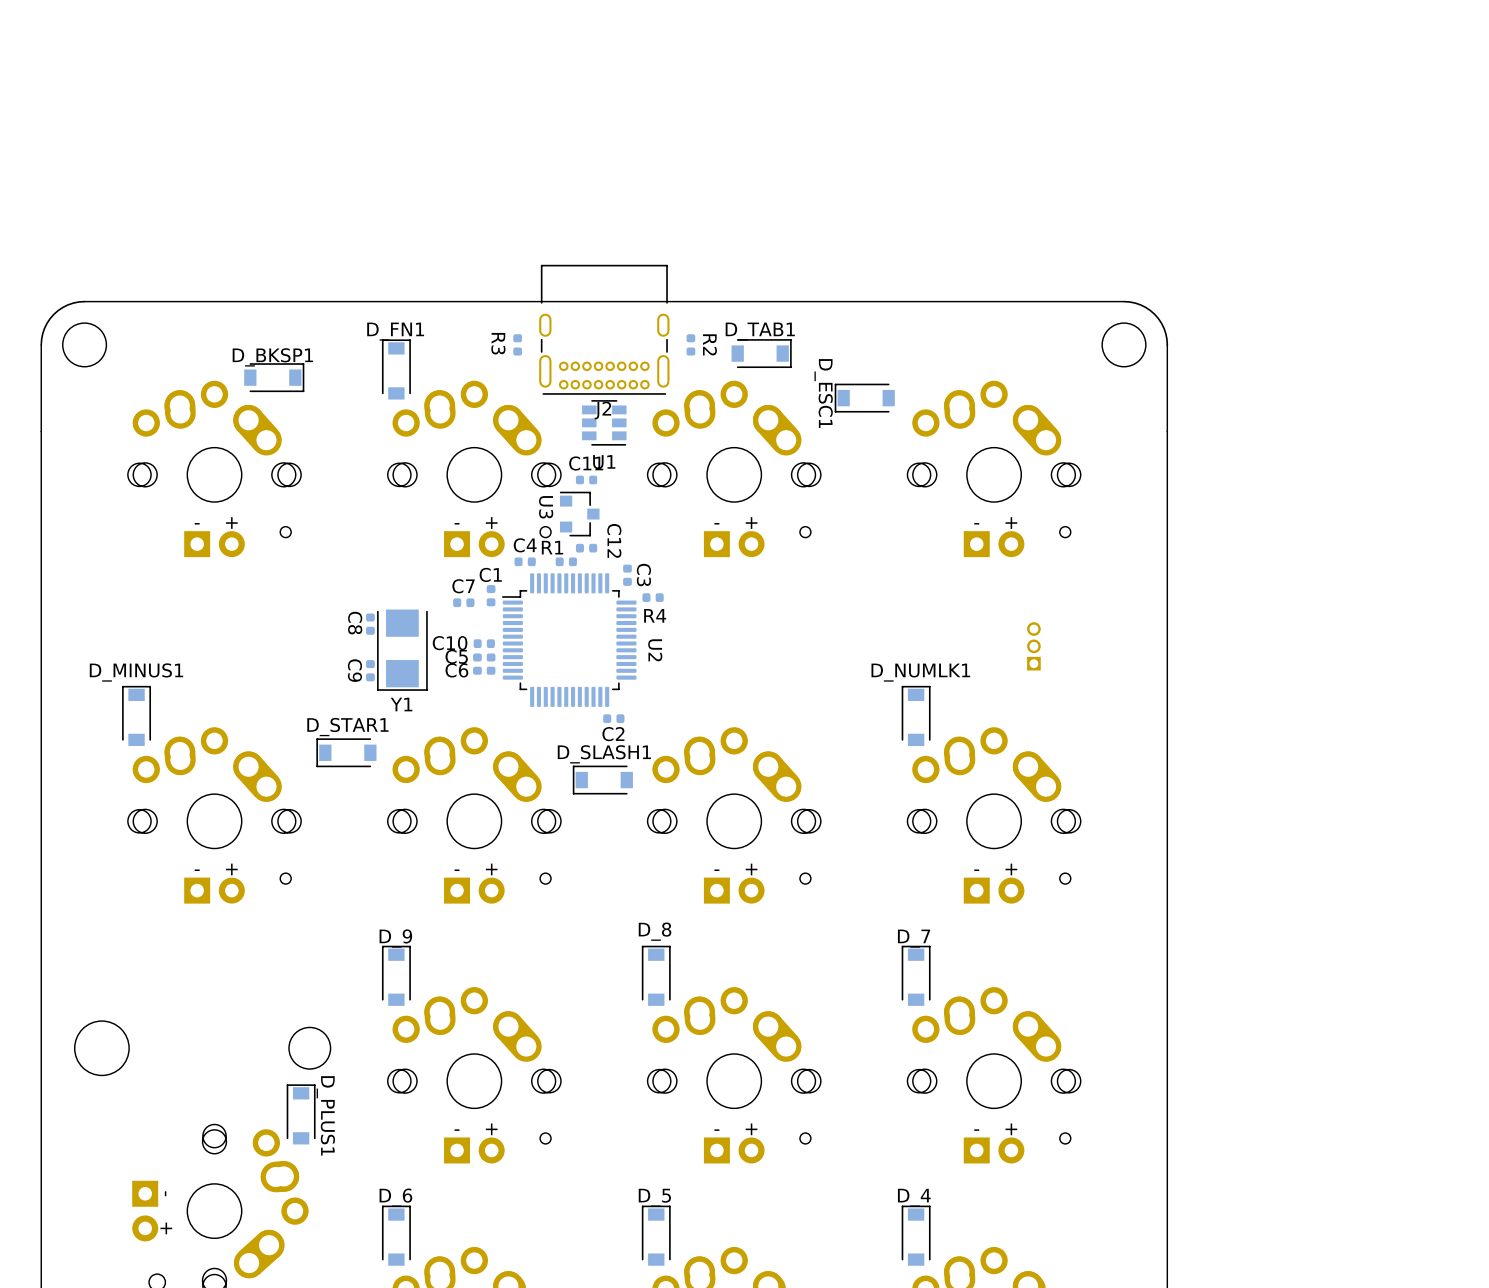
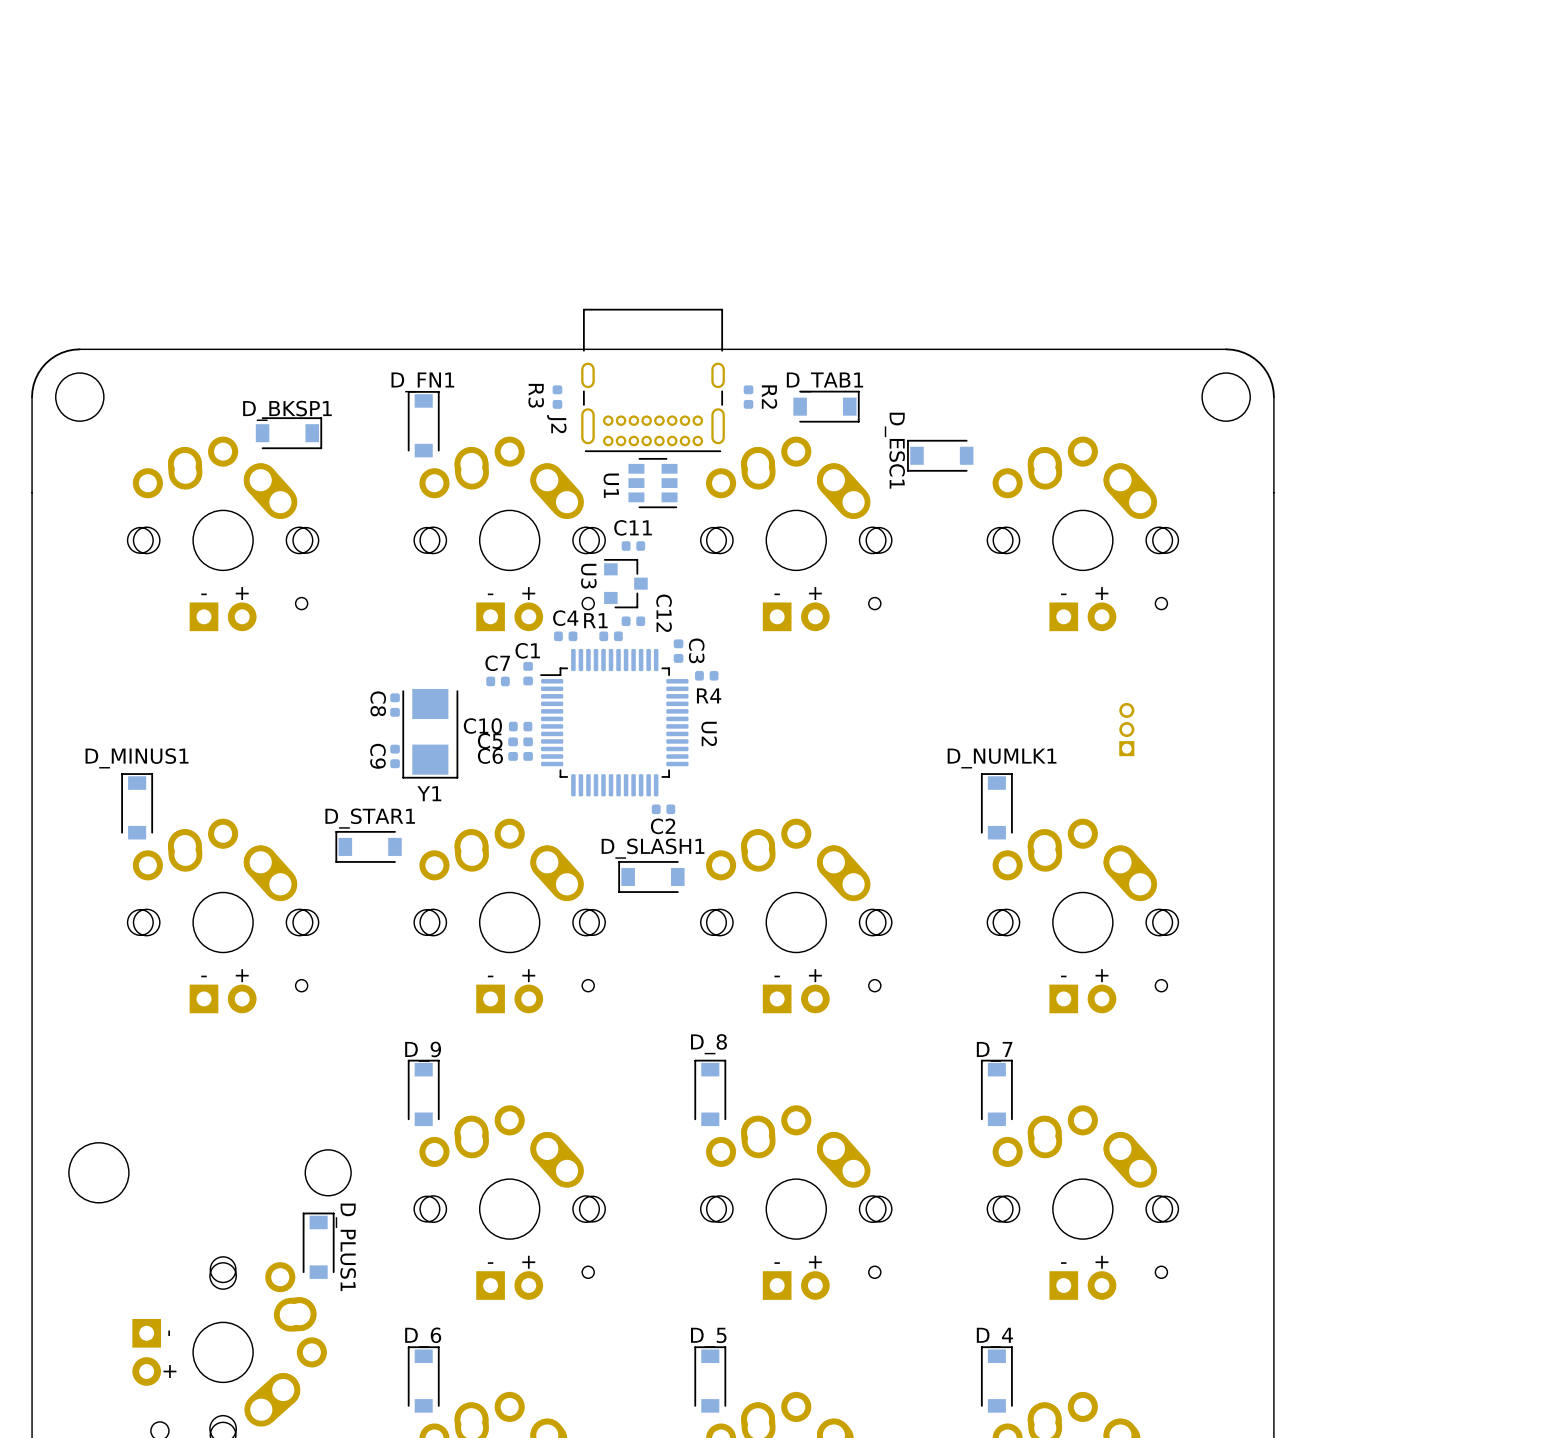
J2 name rotation: 0° (602, 410) -> 90° clockwise (556, 424)
J2 name position: J2 (602, 410) -> J2 (556, 424)
U1 name rotation: 0° (604, 462) -> 90° clockwise (611, 485)
U1 name position: U1 (604, 462) -> U1 (611, 485)

